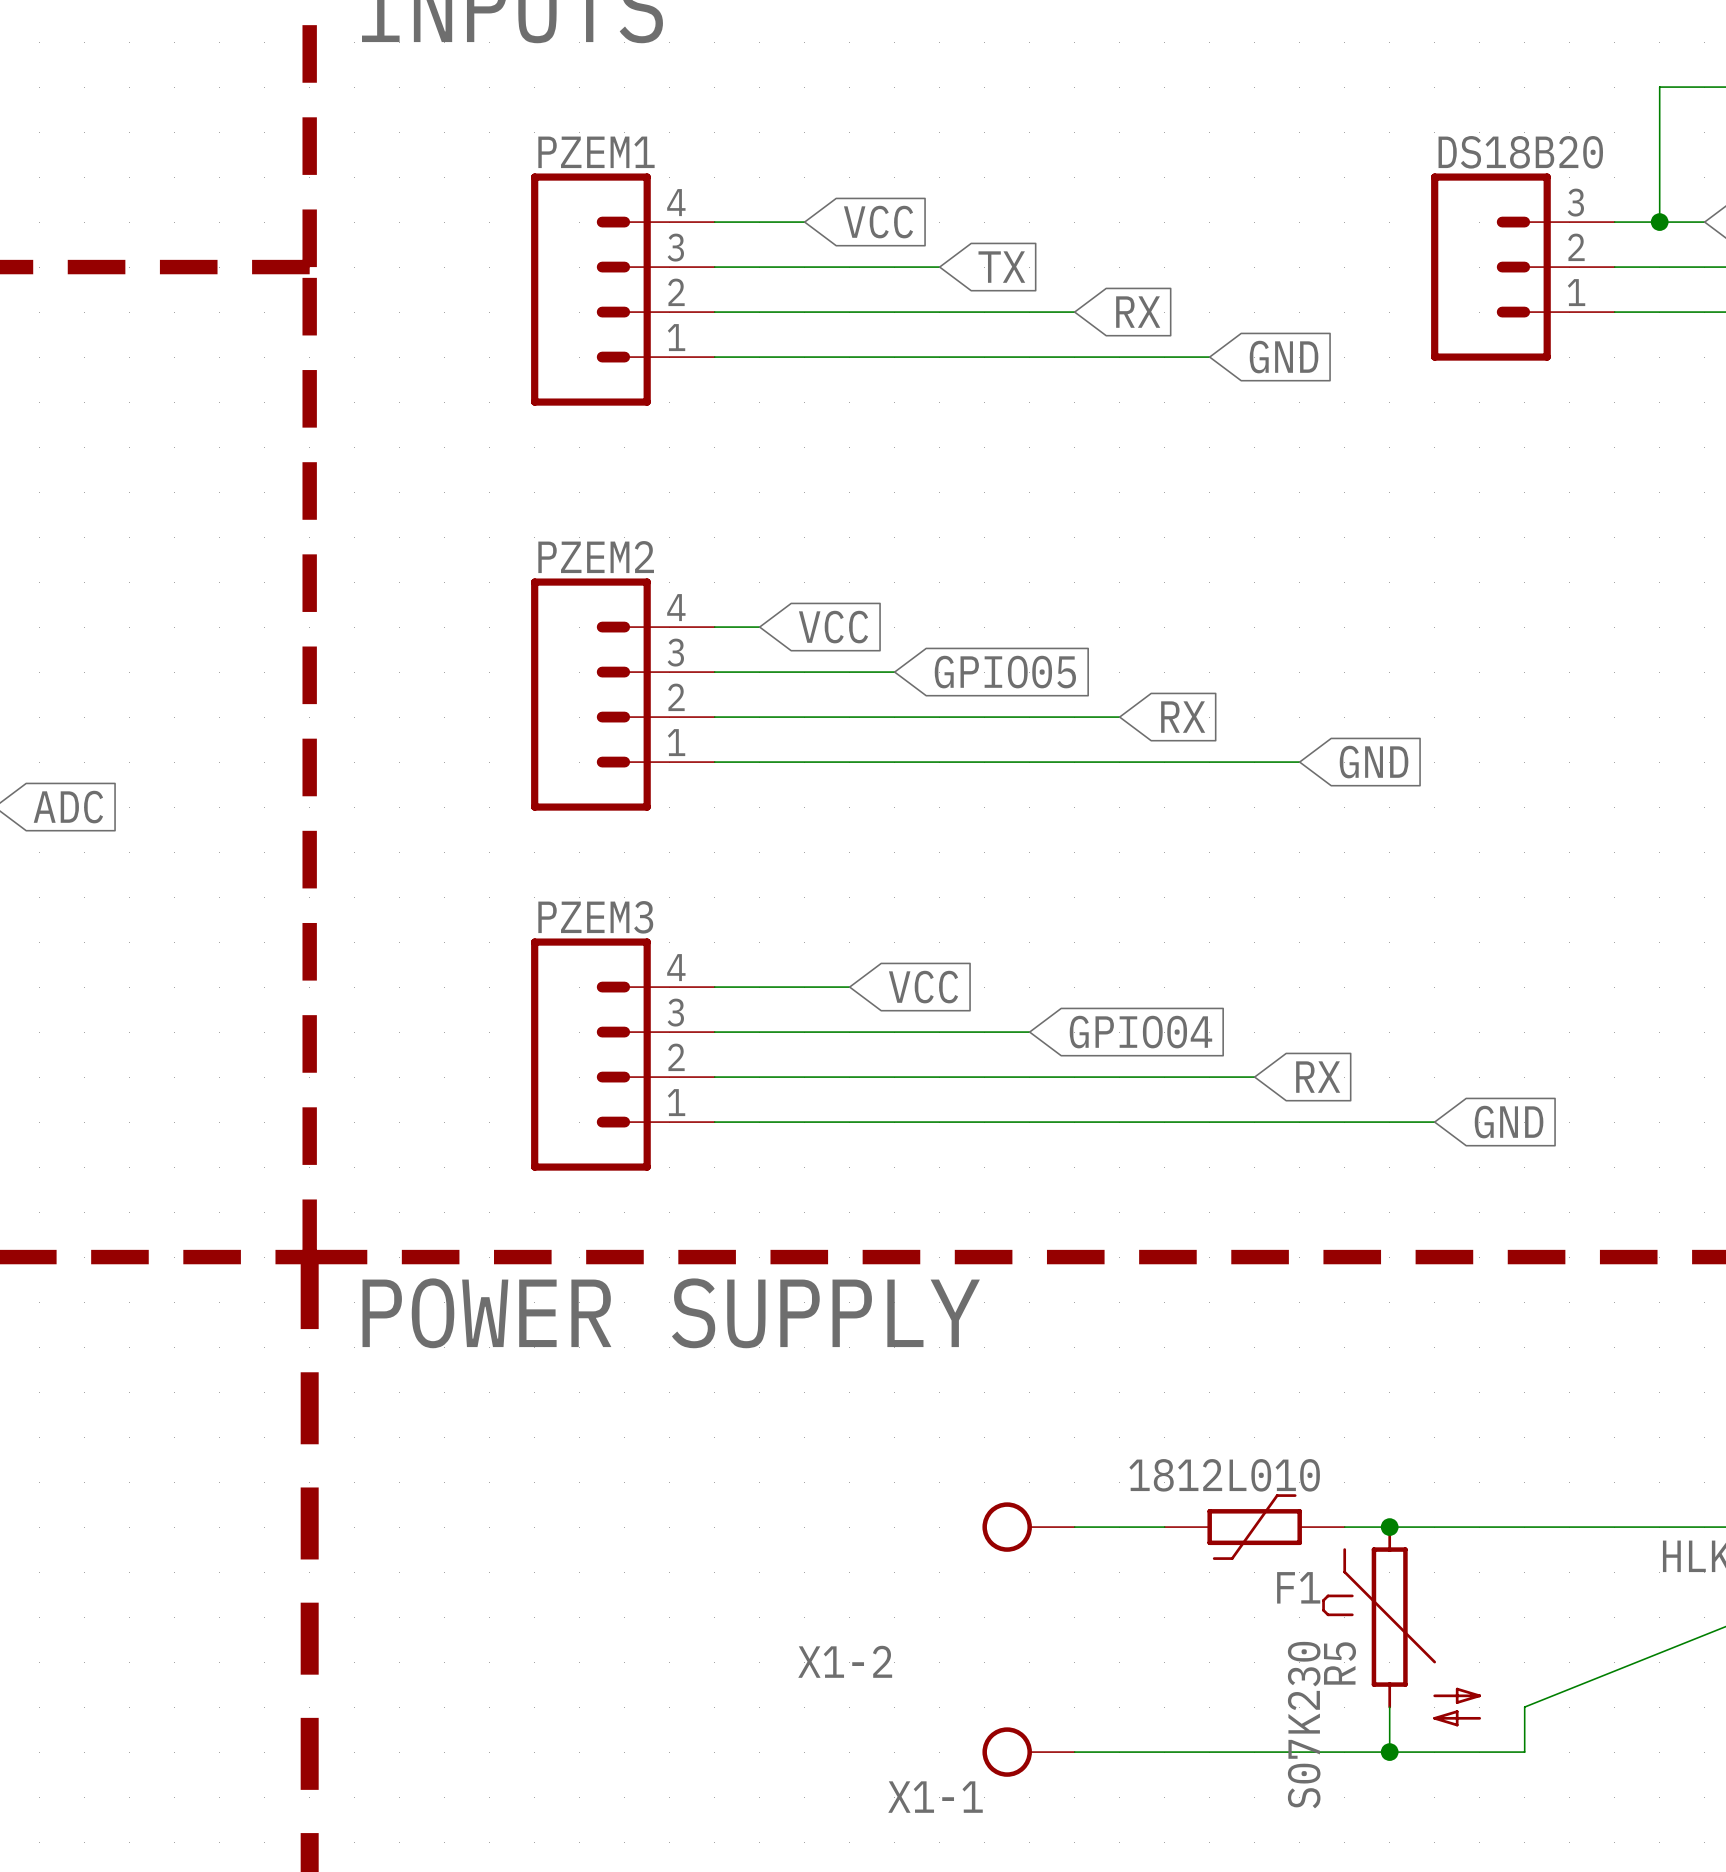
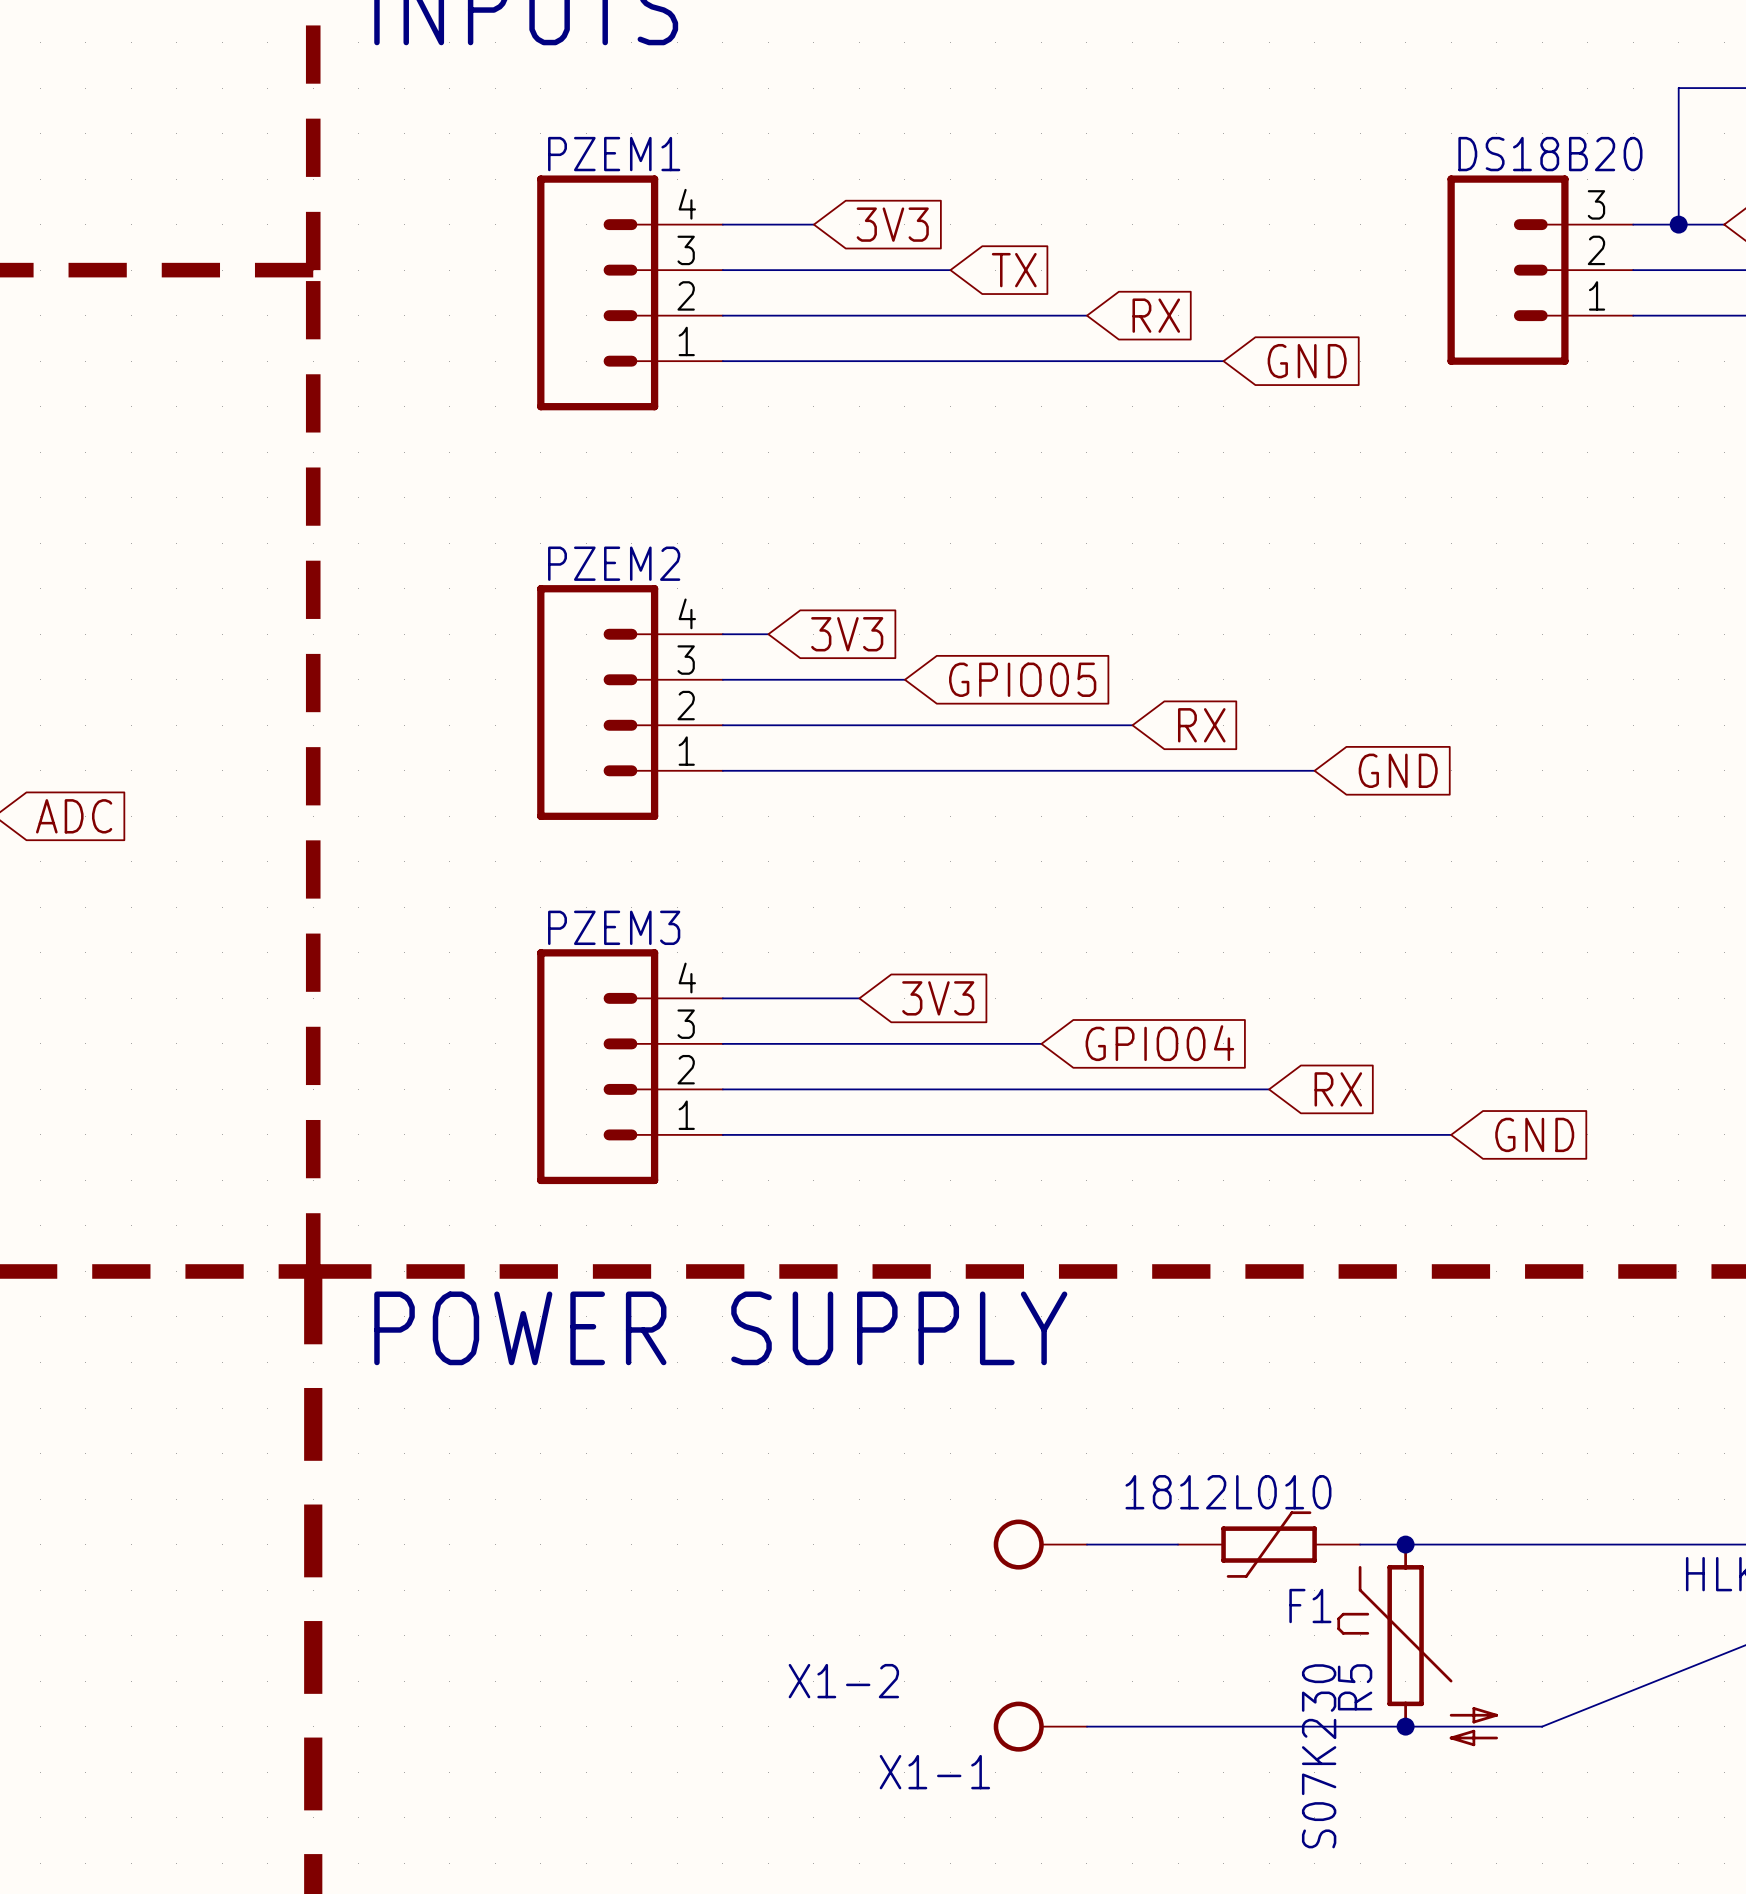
global label: VCC (878, 222) -> 3V3 (892, 224)
global label: VCC (833, 627) -> 3V3 (847, 634)
global label: VCC (923, 987) -> 3V3 (938, 998)
wire: (1389, 1707) (1389, 1752) -> none
wire: (1524, 1707) (1524, 1752) (1074, 1752) -> (1542, 1726) (1086, 1726)
X1-1 position: (1028, 1752) -> (1040, 1726)
junction position: (1389, 1752) -> (1405, 1726)

